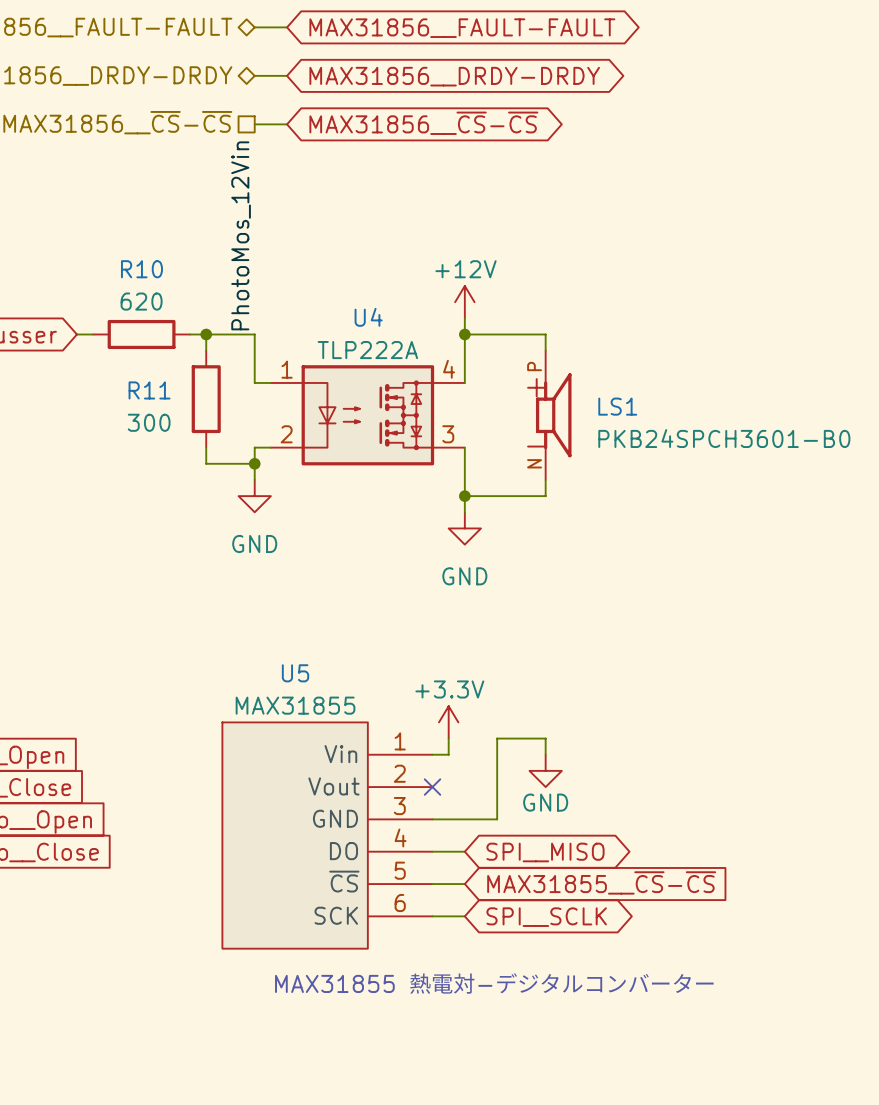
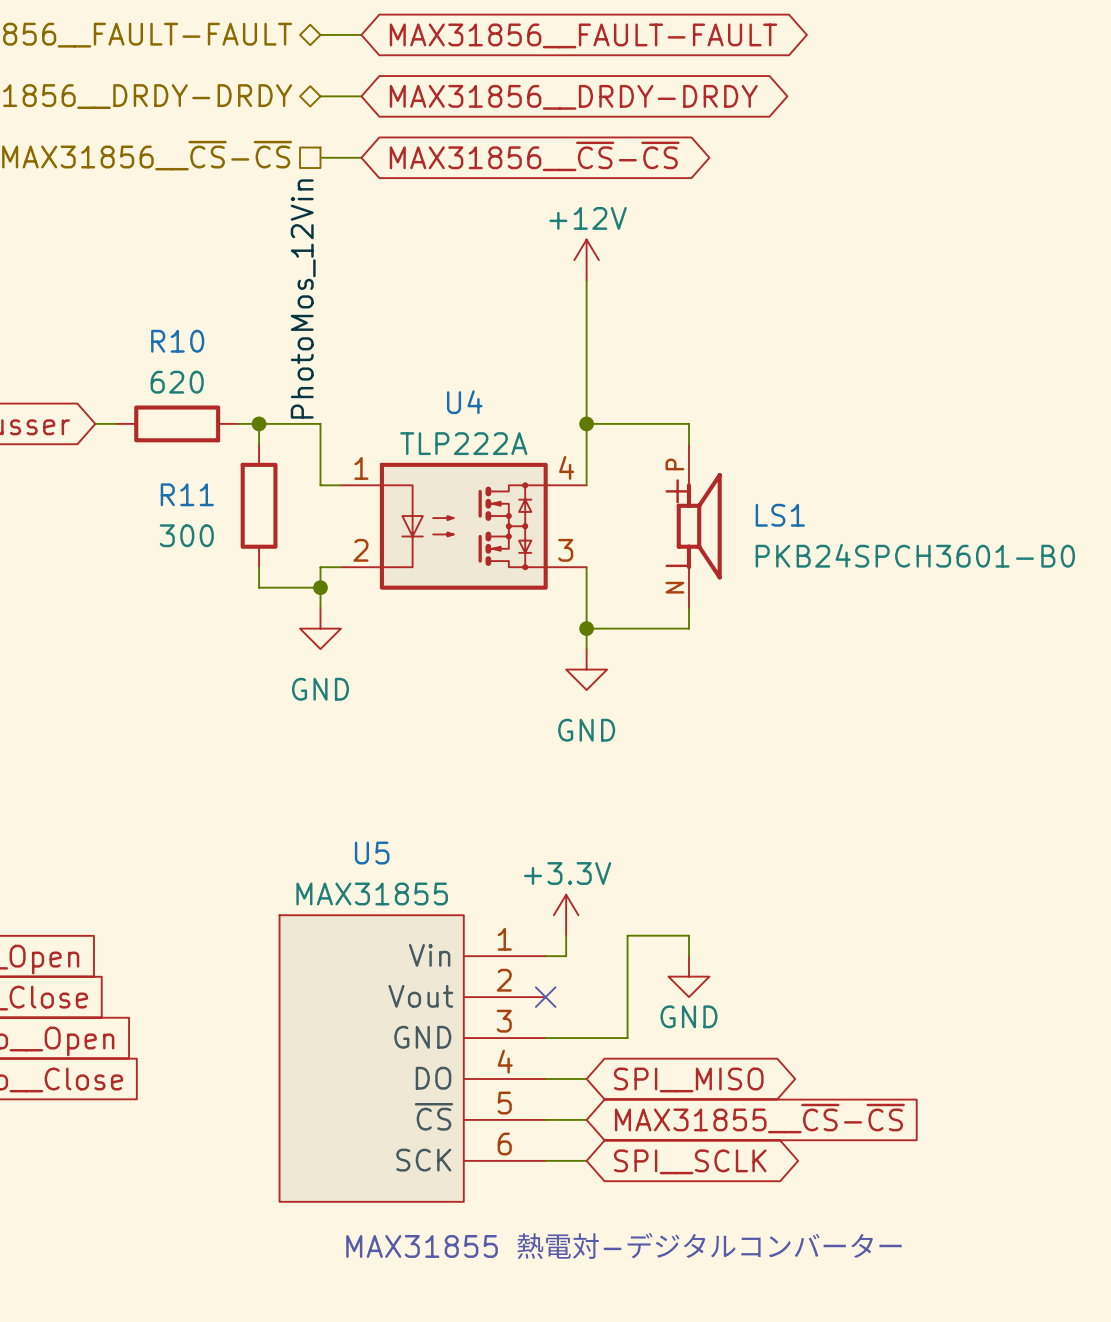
wire: none -> (586, 280) (586, 403)
power symbol position: +12V (464, 302) -> +12V (586, 260)

